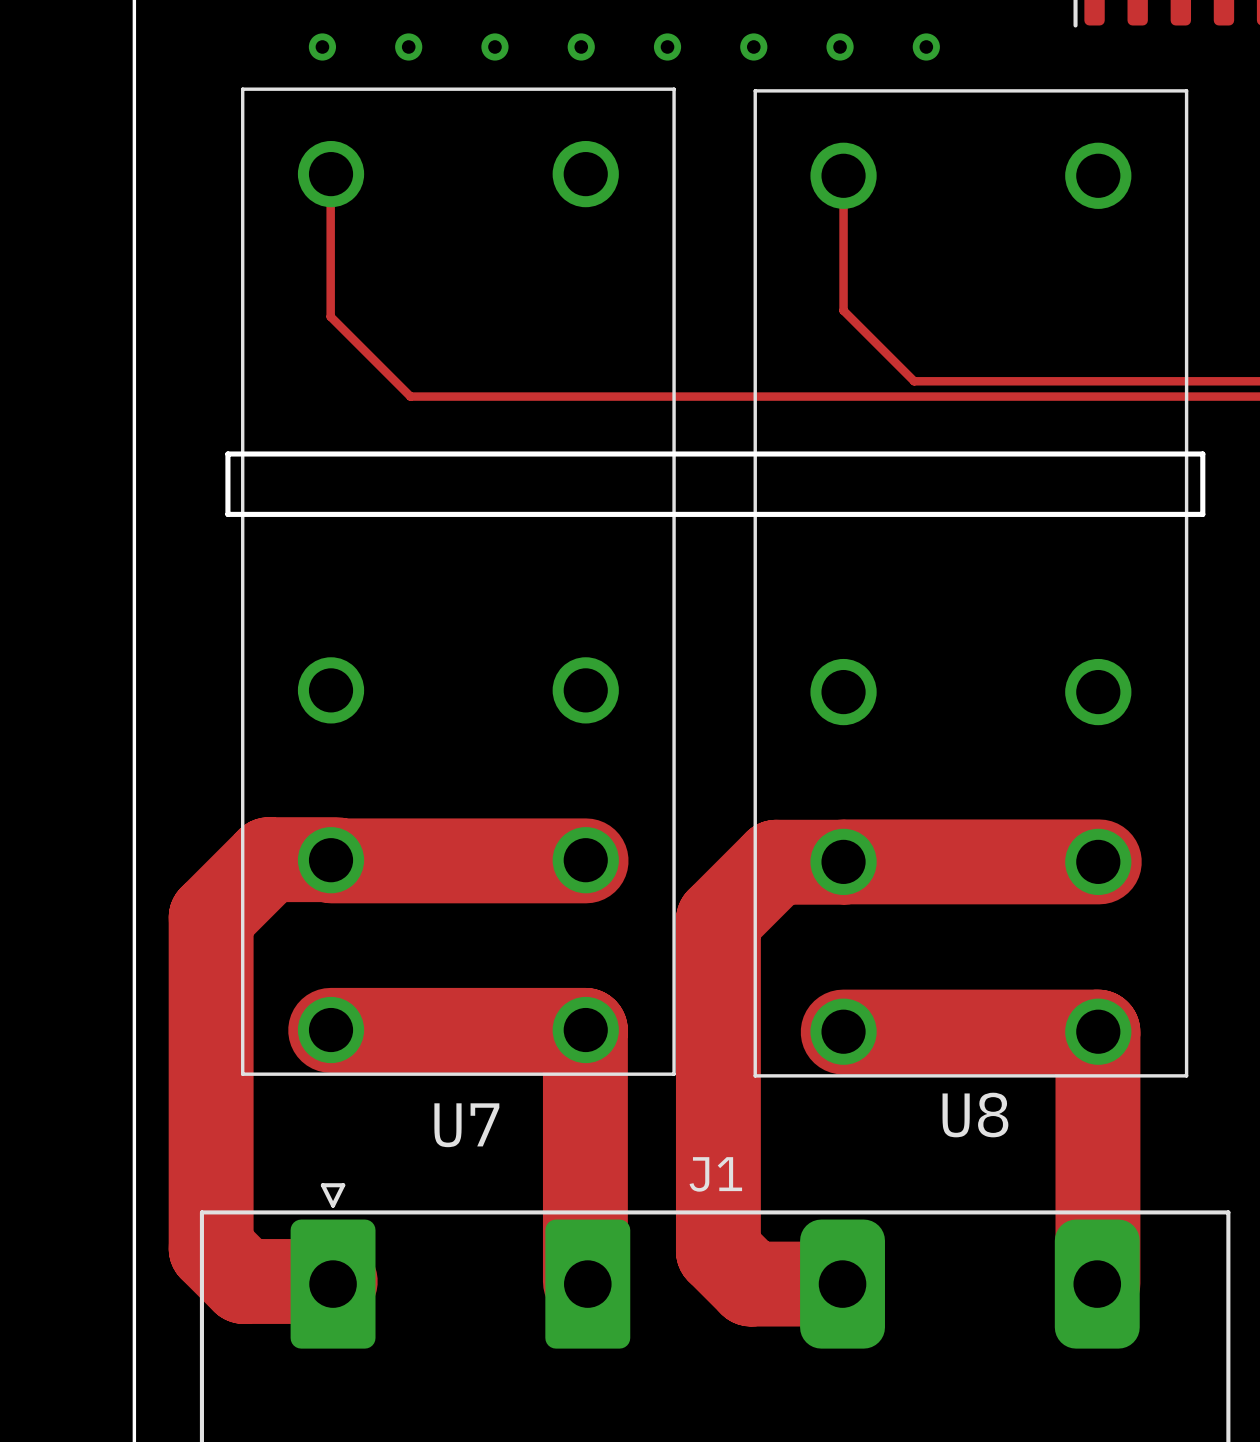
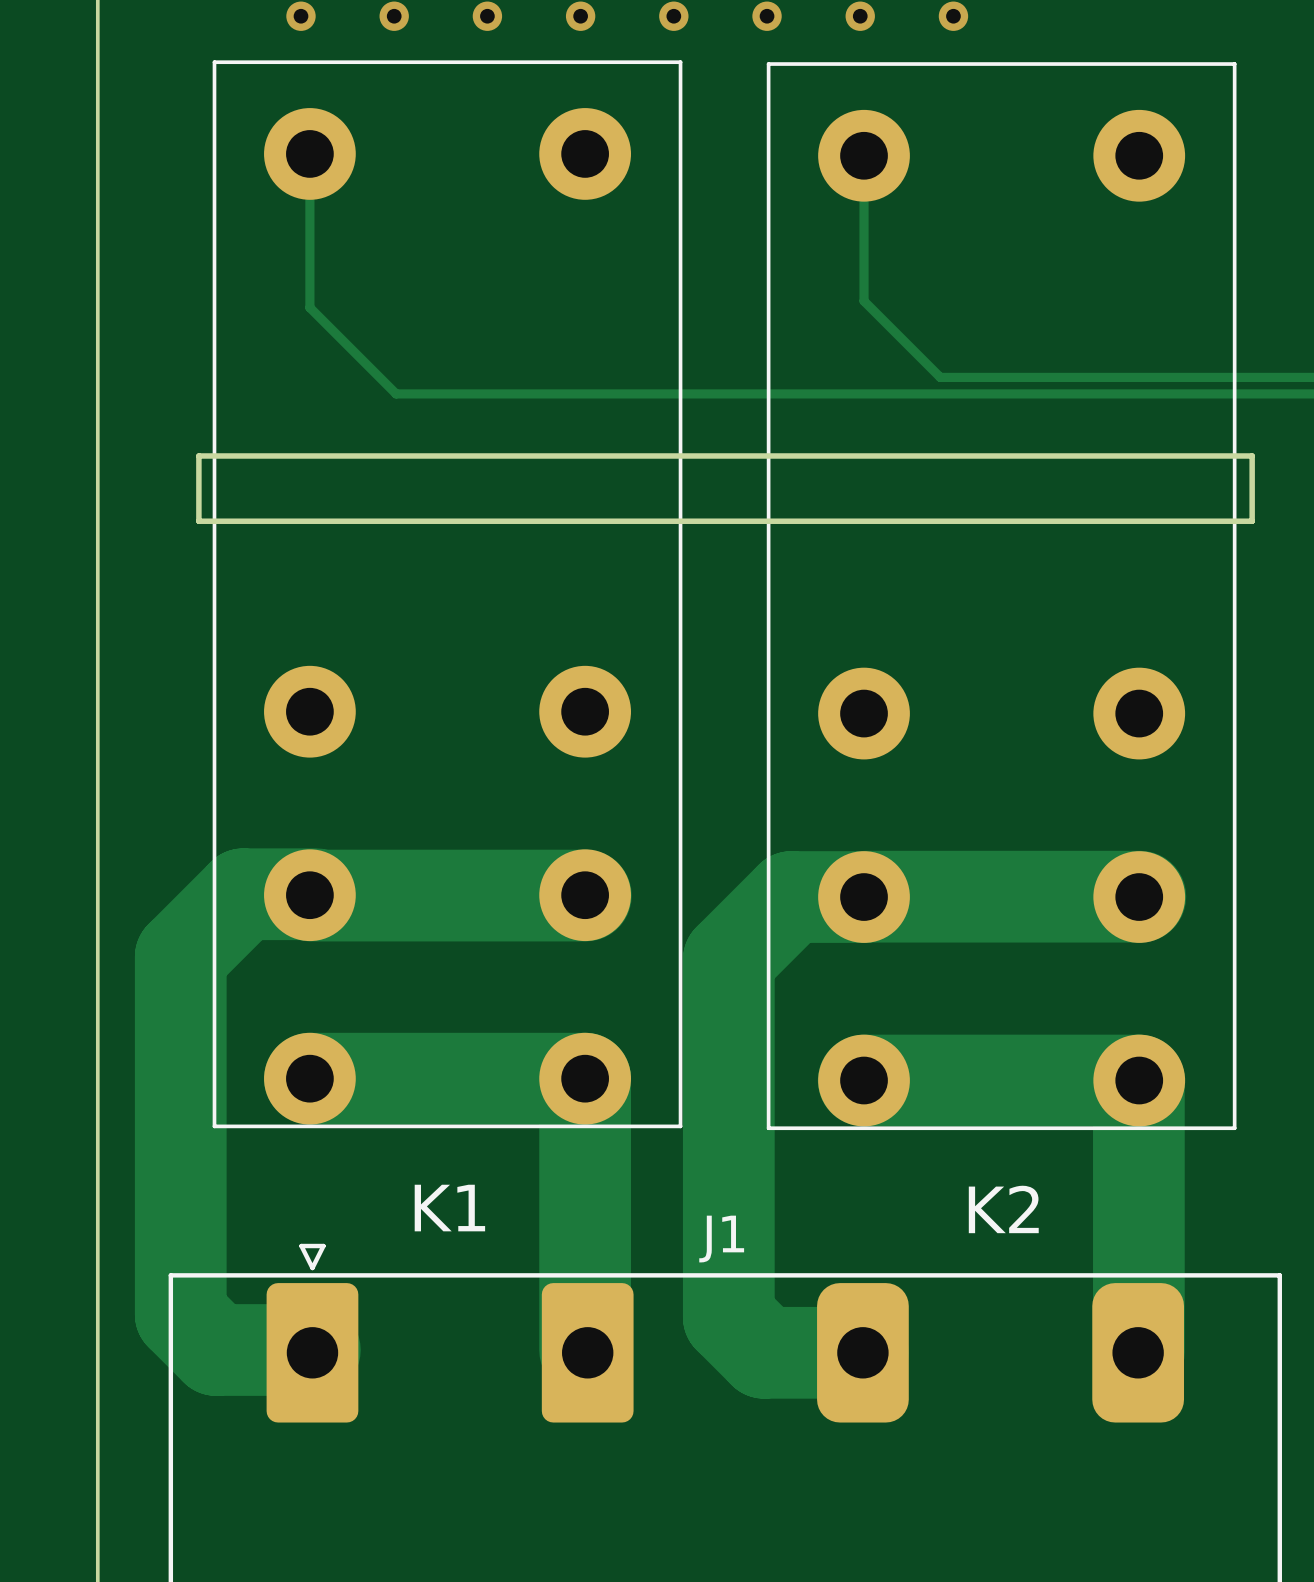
U7: (458, 581) -> none
K1: none -> (447, 594)
U8: (970, 583) -> none
K2: none -> (1001, 596)

